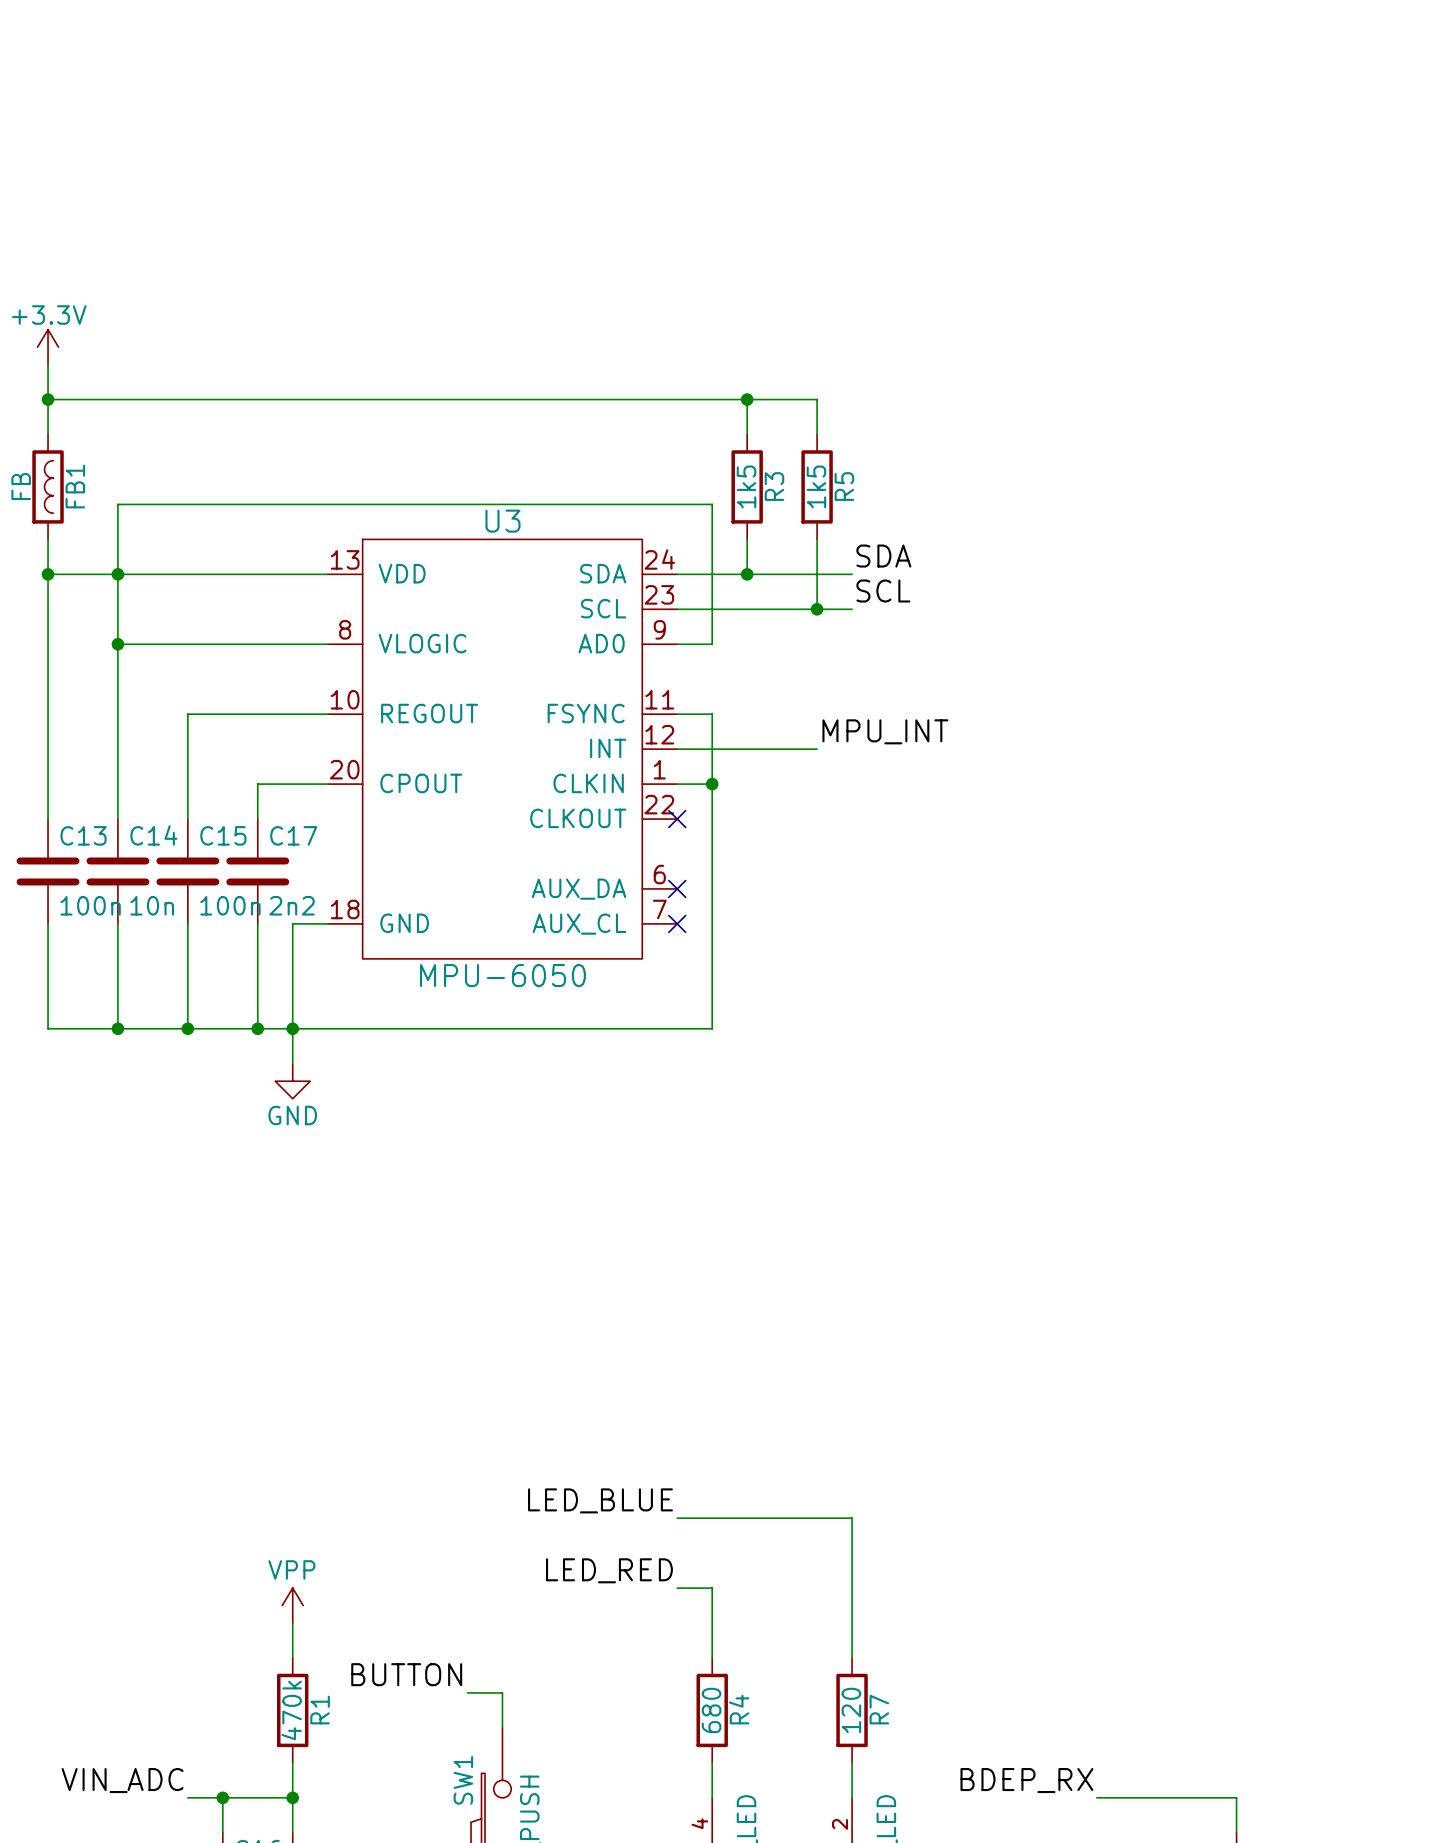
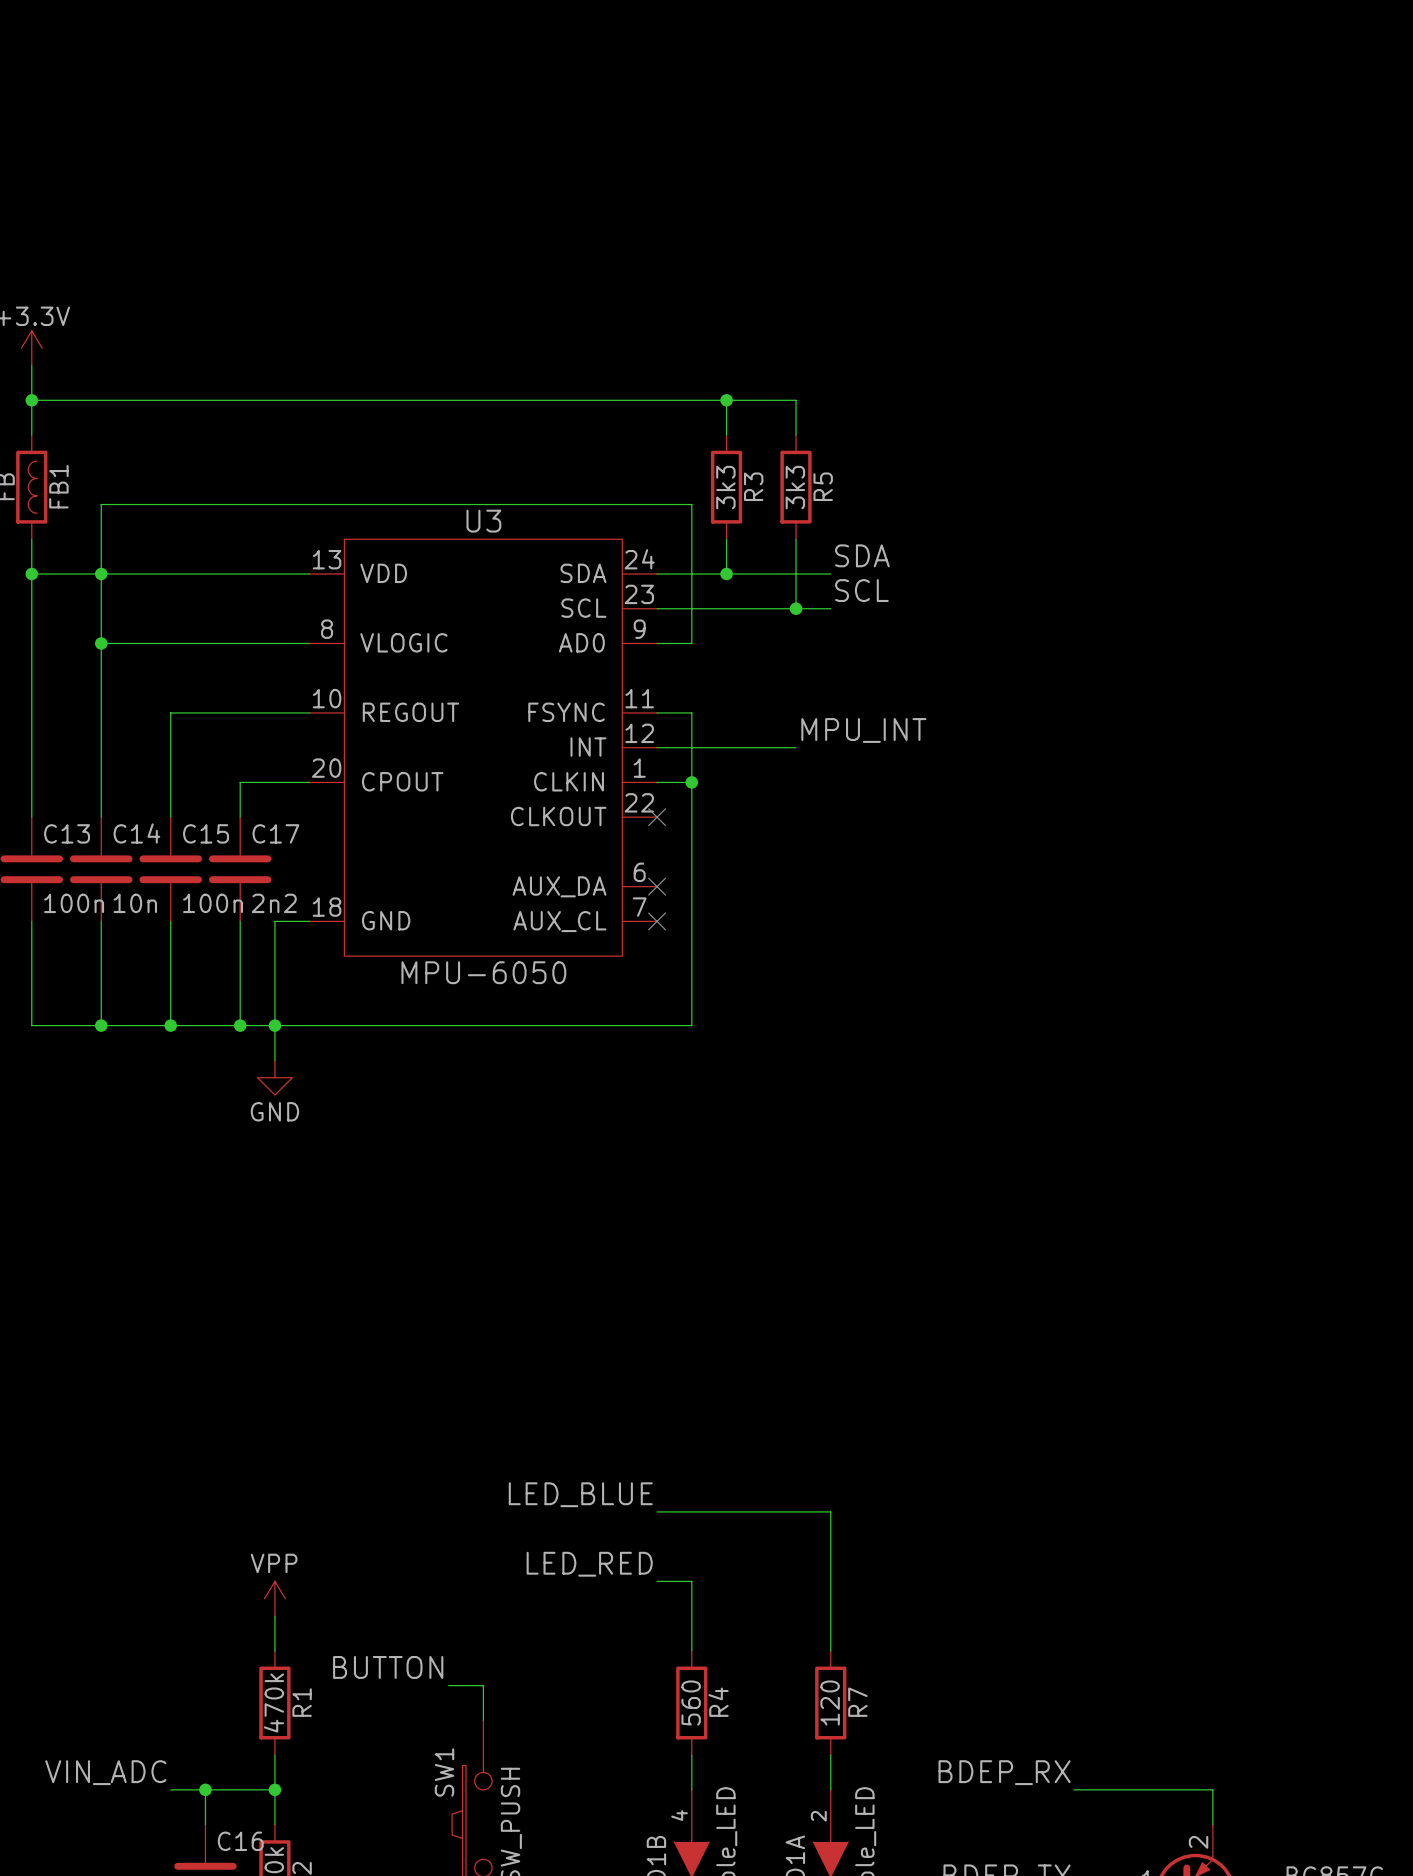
R3 value: 1k5 (746, 486) -> 3k3 (725, 487)
R5 value: 1k5 (816, 486) -> 3k3 (795, 487)
R4 value: 680 (711, 1710) -> 560 (691, 1703)

